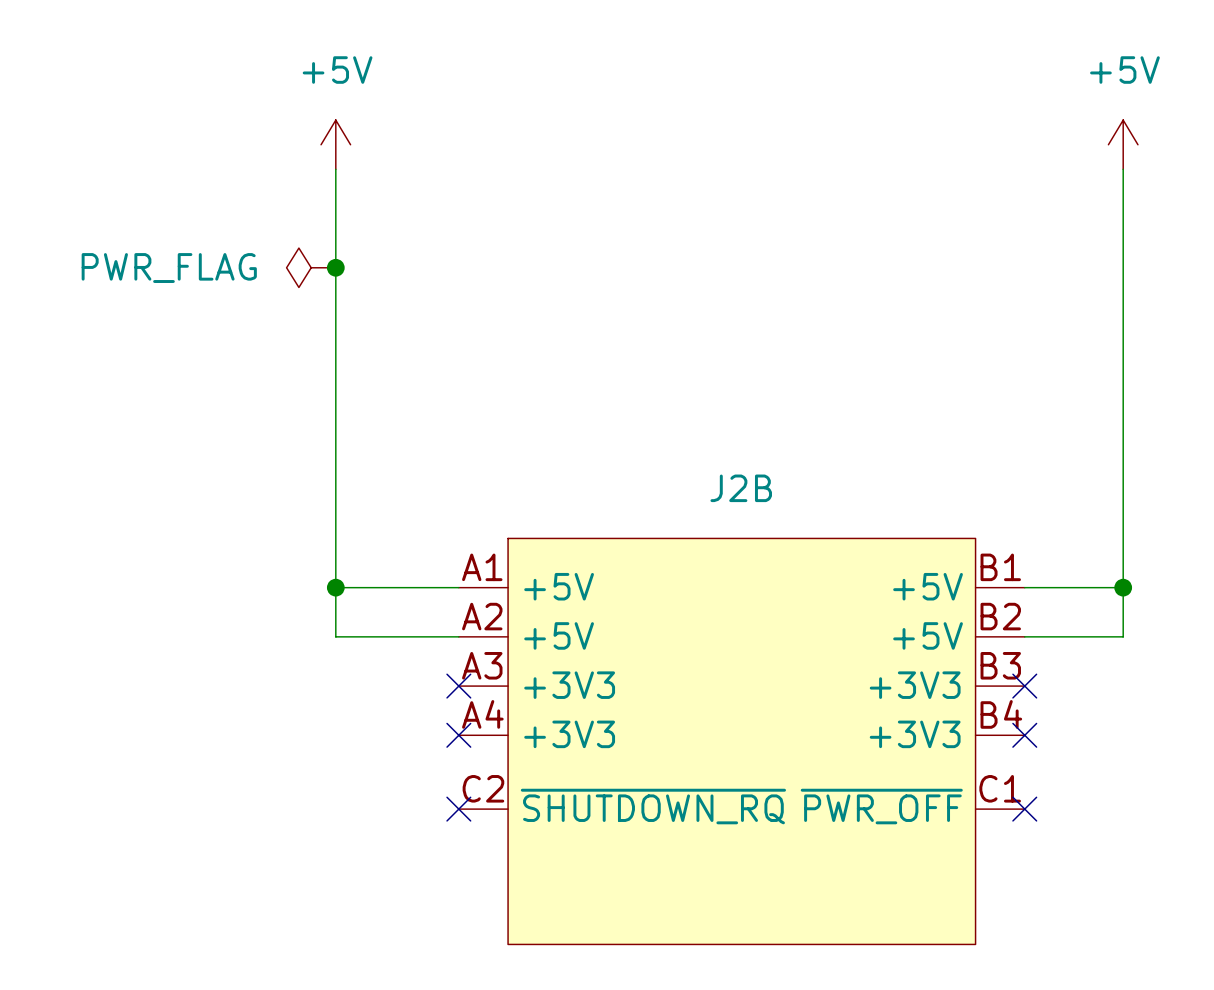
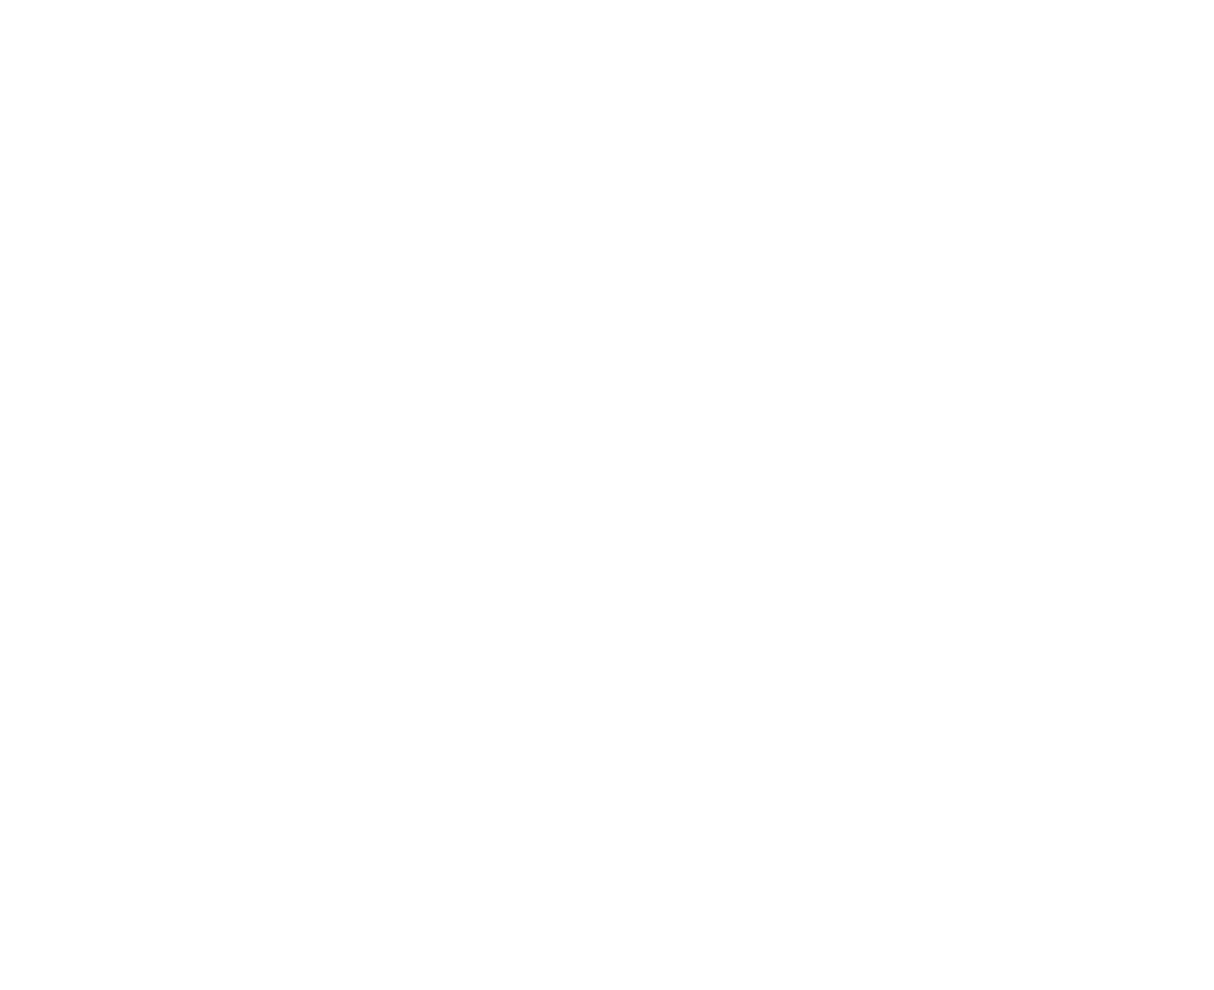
power symbol: +5V (335, 144) -> none
power symbol: +5V (1123, 144) -> none
wire: (335, 169) (335, 636) (458, 636) -> none
wire: (1123, 169) (1123, 636) (1024, 636) -> none
power symbol: PWR_FLAG (311, 267) -> none
junction: (335, 267) -> none
wire: (335, 587) (458, 587) -> none
junction: (335, 587) -> none
wire: (1024, 587) (1123, 587) -> none
junction: (1123, 587) -> none
no-connect mark: (458, 686) -> none
no-connect mark: (1024, 686) -> none
no-connect mark: (458, 735) -> none
no-connect mark: (1024, 735) -> none
J2B: (741, 741) -> none
no-connect mark: (458, 809) -> none
no-connect mark: (1024, 809) -> none

